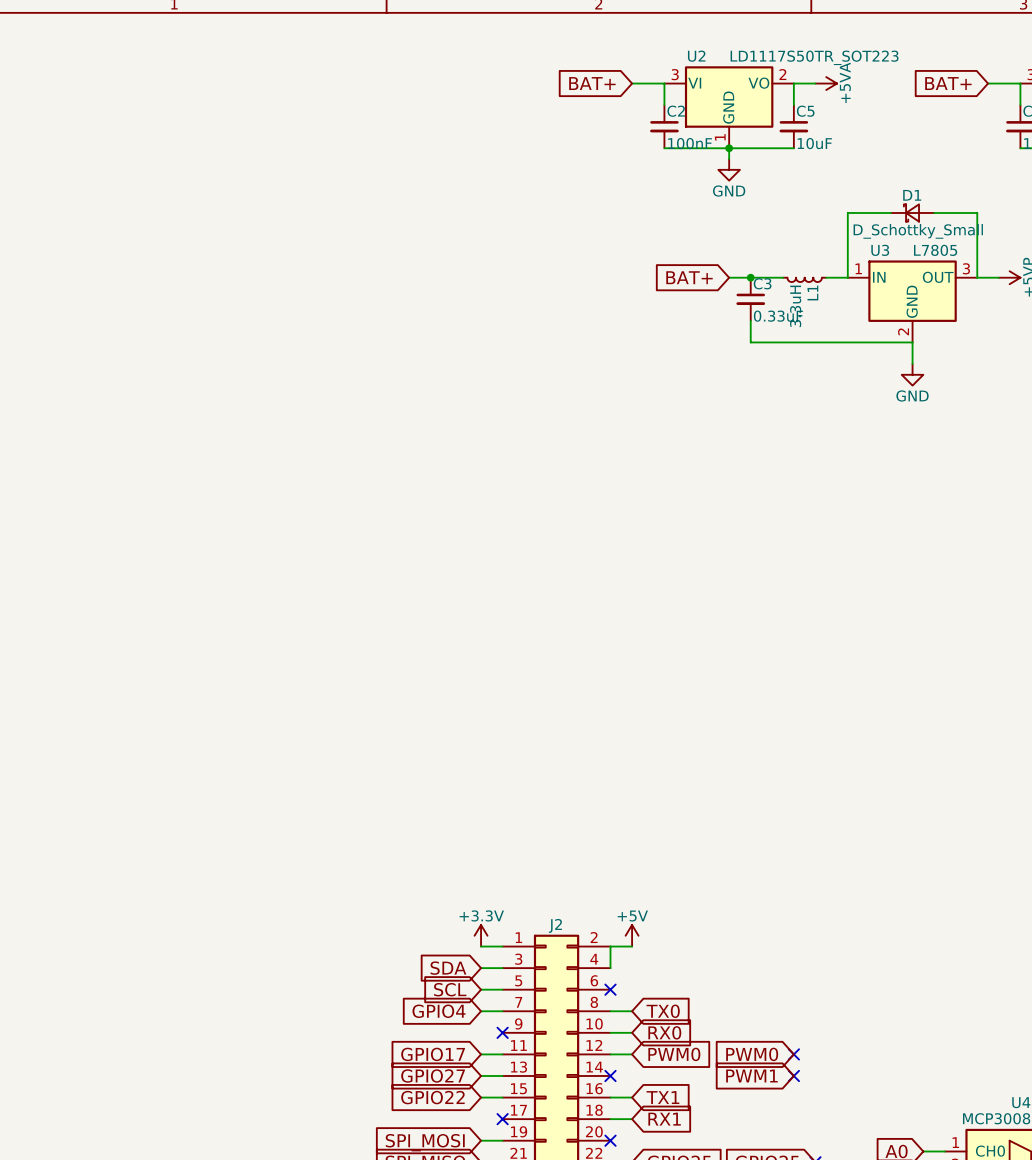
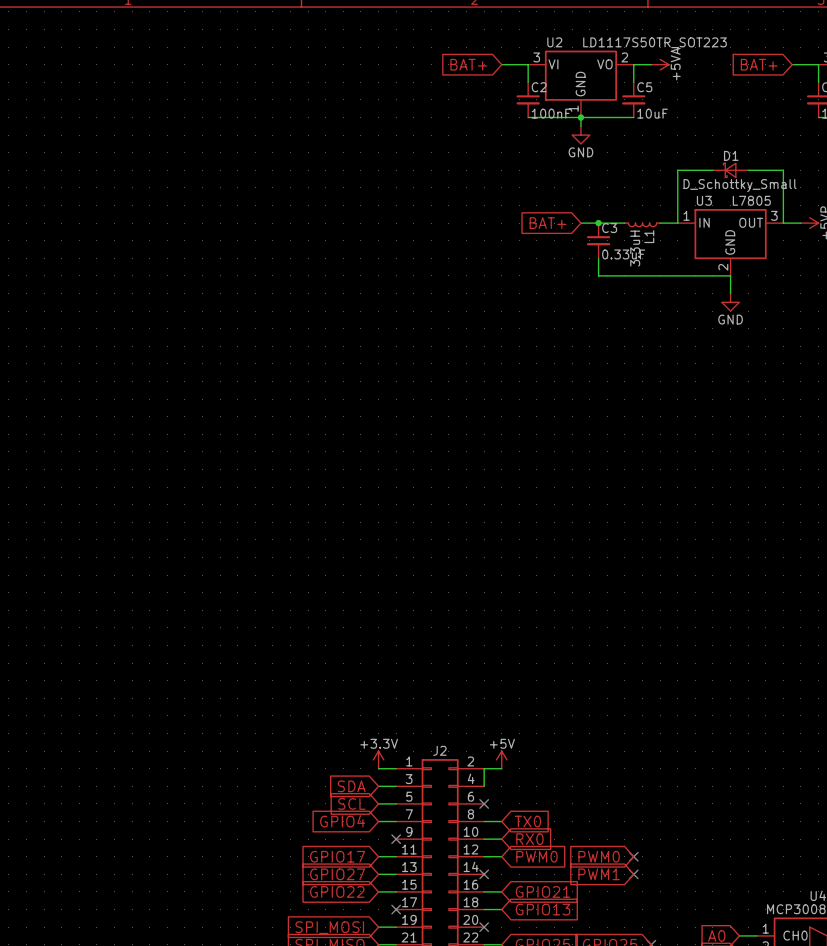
global label: TX1 (662, 1097) -> GPIO21 (543, 891)
global label: RX1 (664, 1119) -> GPIO13 (543, 909)

